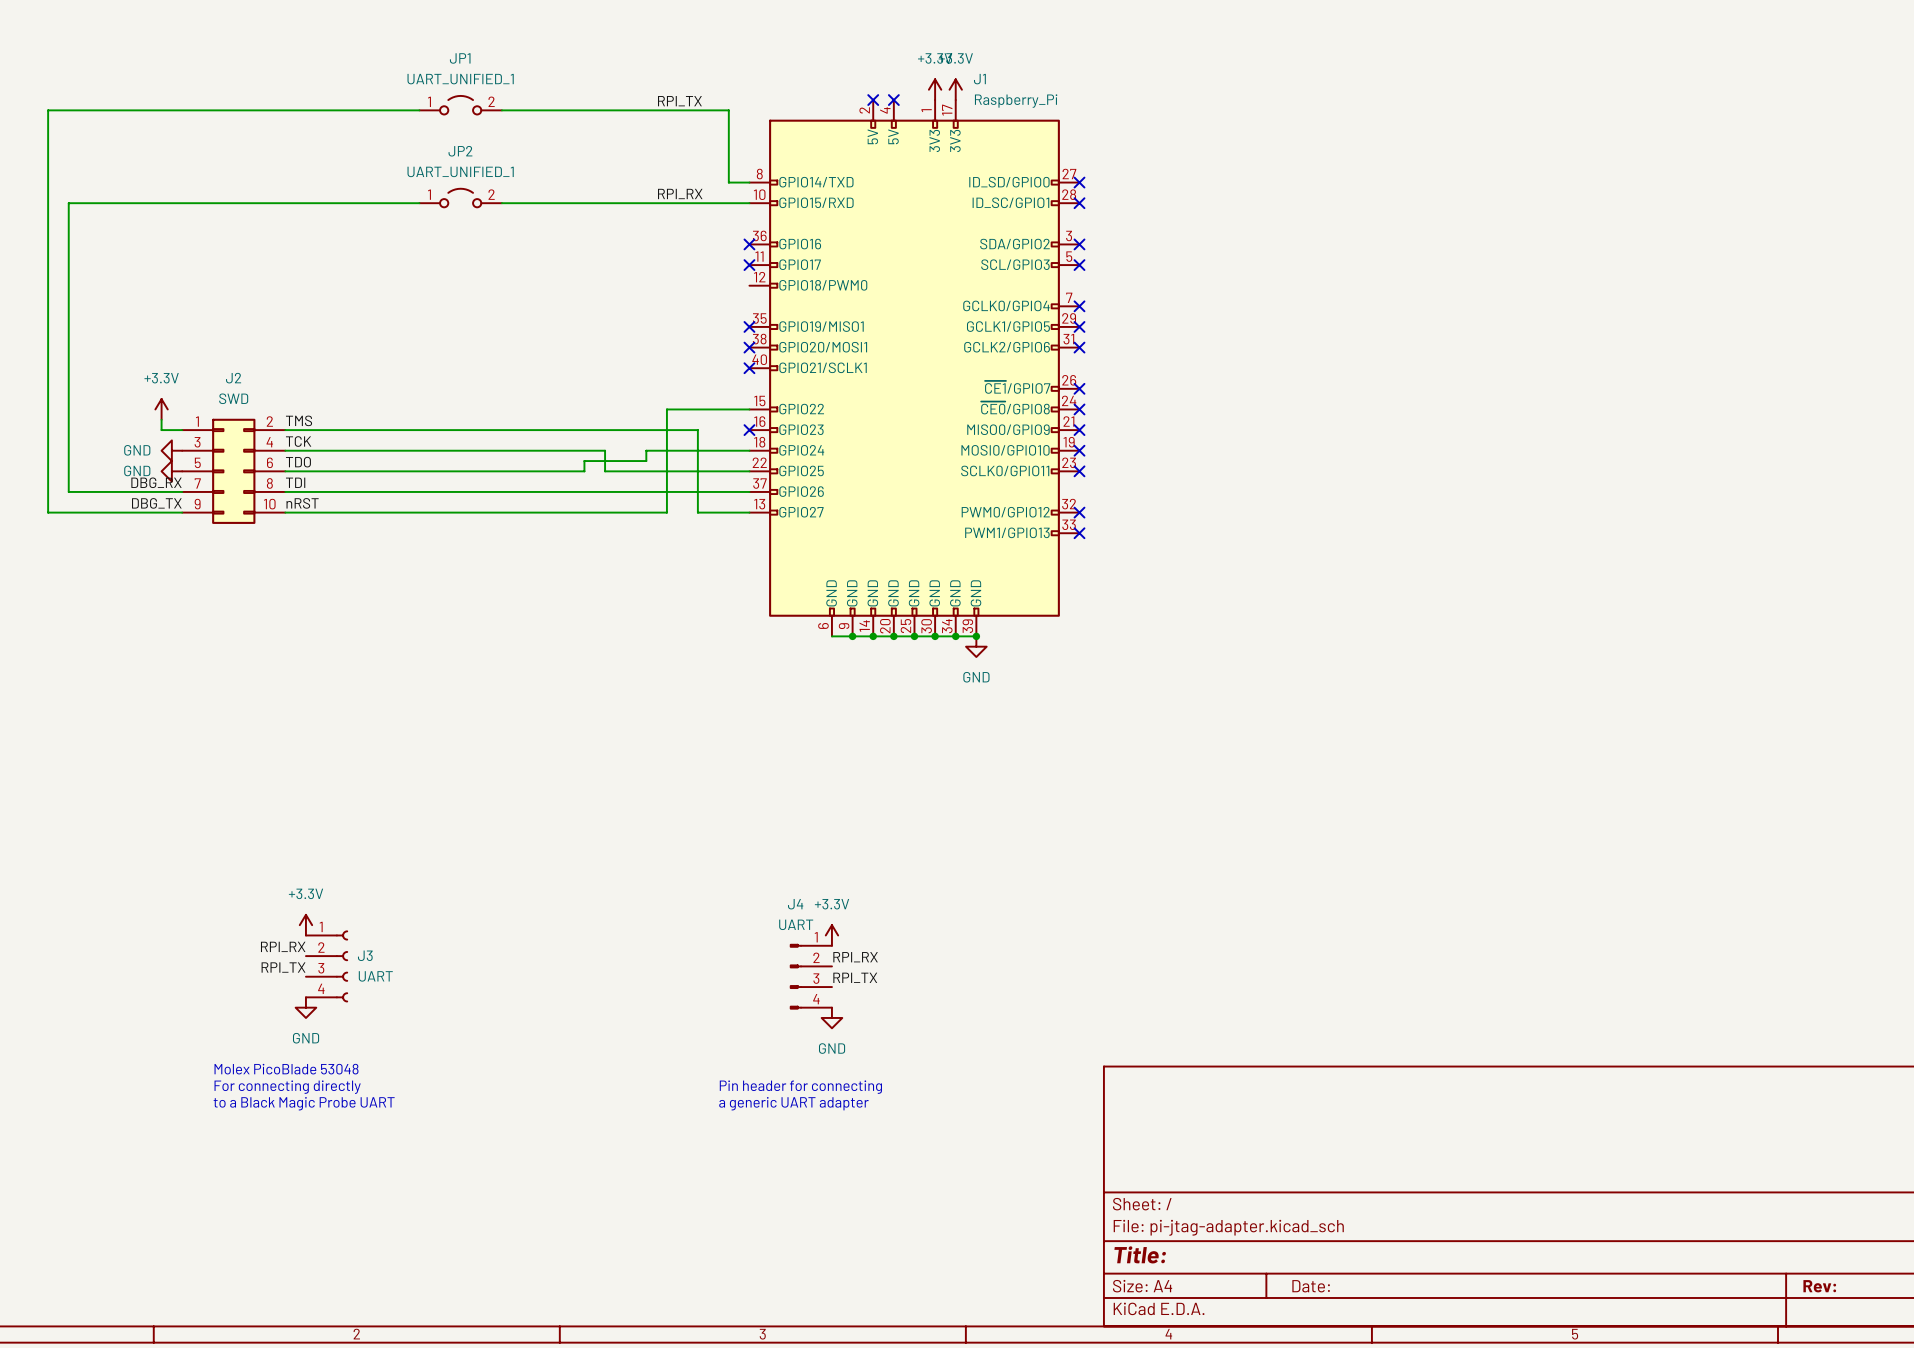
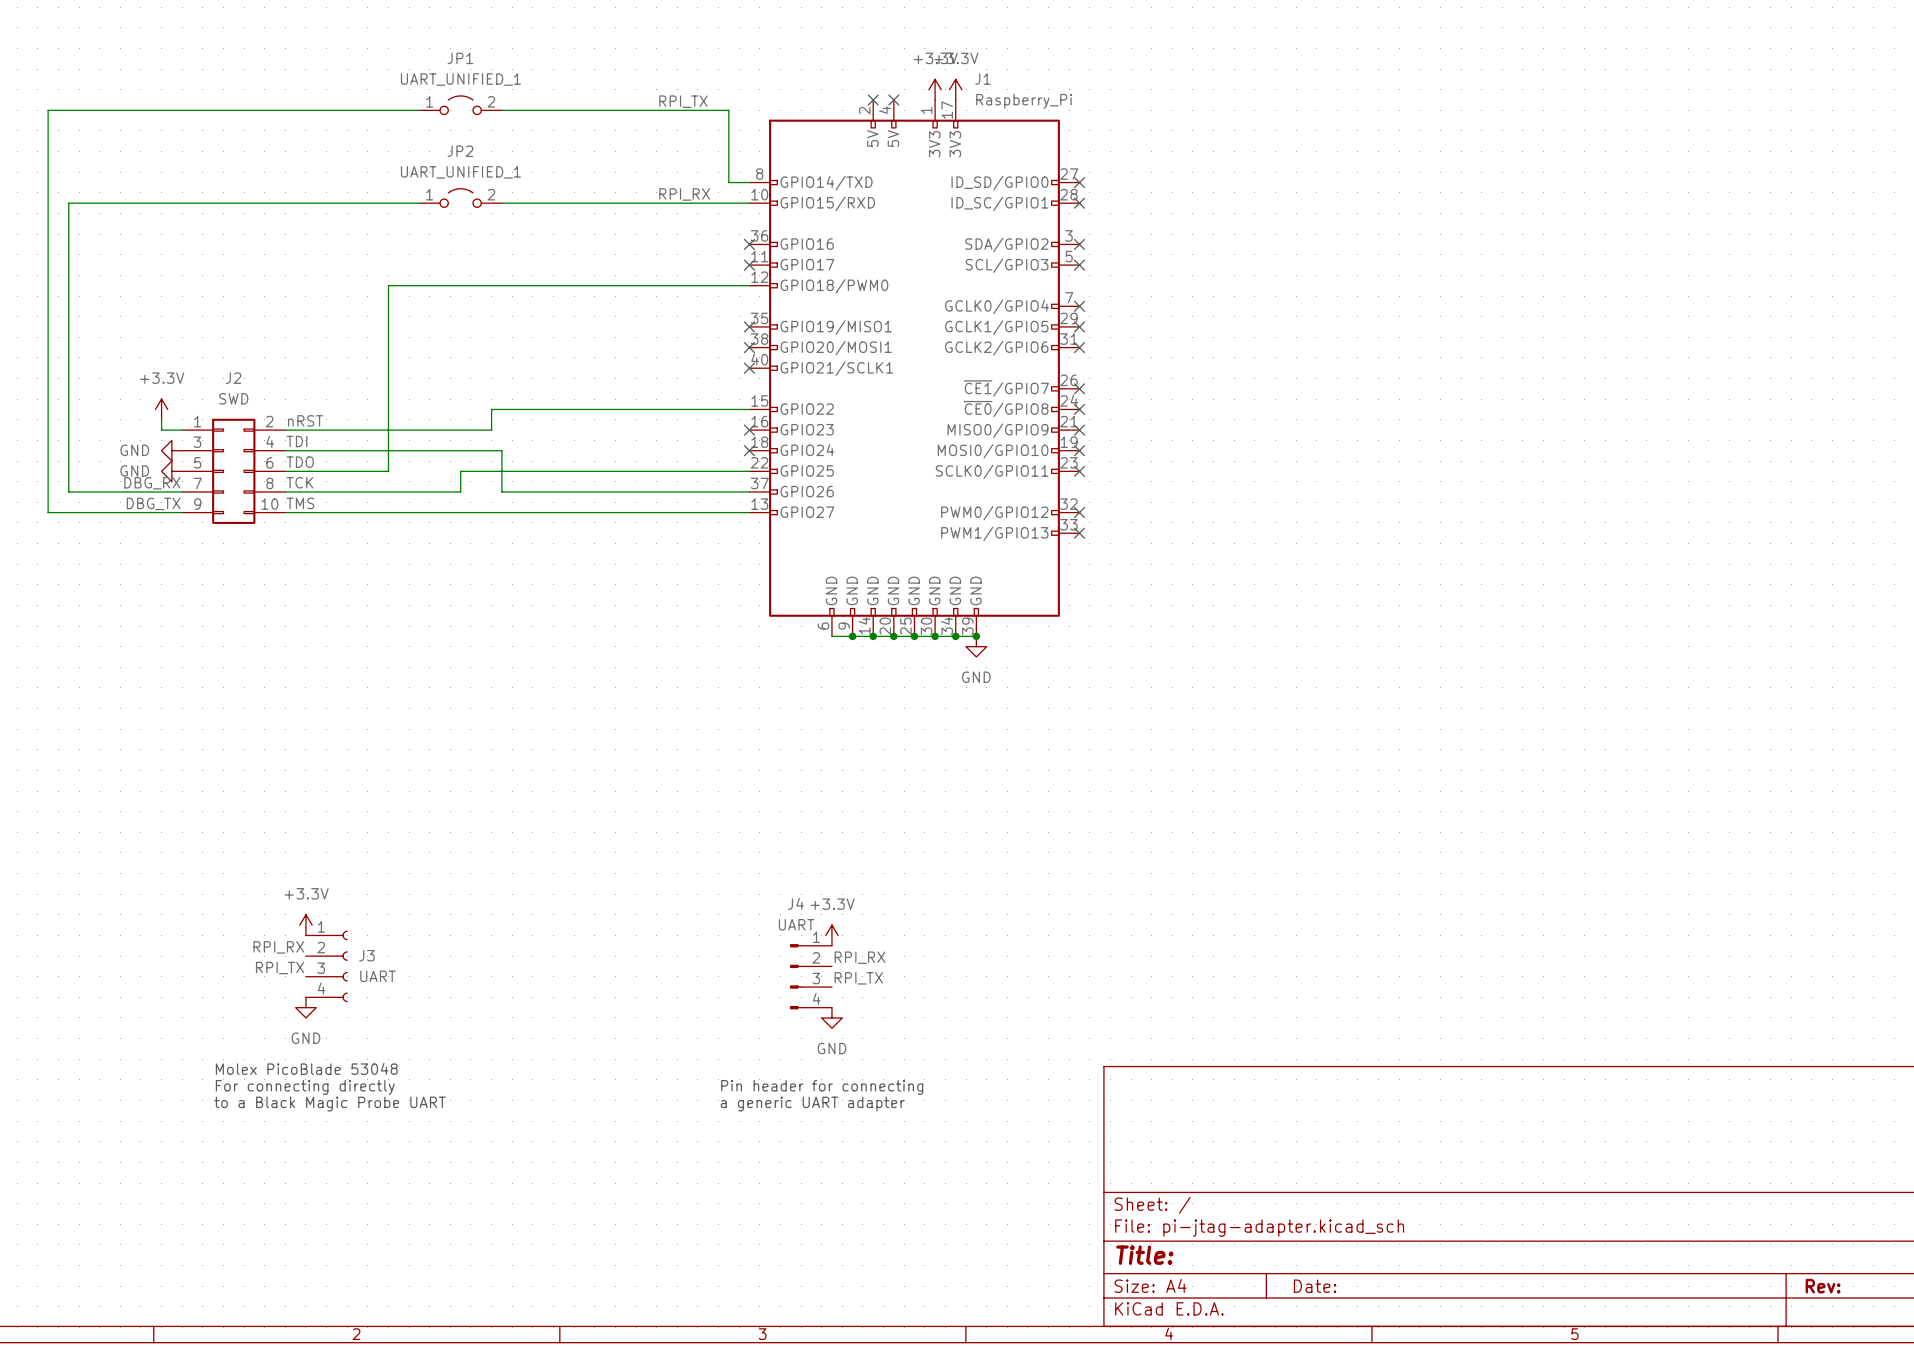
wire: (666, 409) (666, 512) -> (697, 512) (666, 512)
label: TMS (299, 420) -> nRST (305, 420)
wire: (491, 430) (697, 430) (697, 512) -> (491, 430) (491, 409) (666, 409)
label: TCK (298, 441) -> TDI (296, 441)
wire: (501, 450) (605, 450) (605, 471) -> (584, 471) (605, 471)
wire: none -> (501, 450) (501, 491)
wire: (749, 450) (646, 450) (646, 461) (584, 461) (584, 471) -> none
no-connect mark: none -> (749, 450)
wire: (388, 471) (460, 471) -> (388, 471) (388, 285) (749, 285)
label: TDI (295, 482) -> TCK (299, 482)
wire: (460, 491) (501, 491) -> (460, 491) (460, 471)
label: nRST (302, 503) -> TMS (300, 503)

